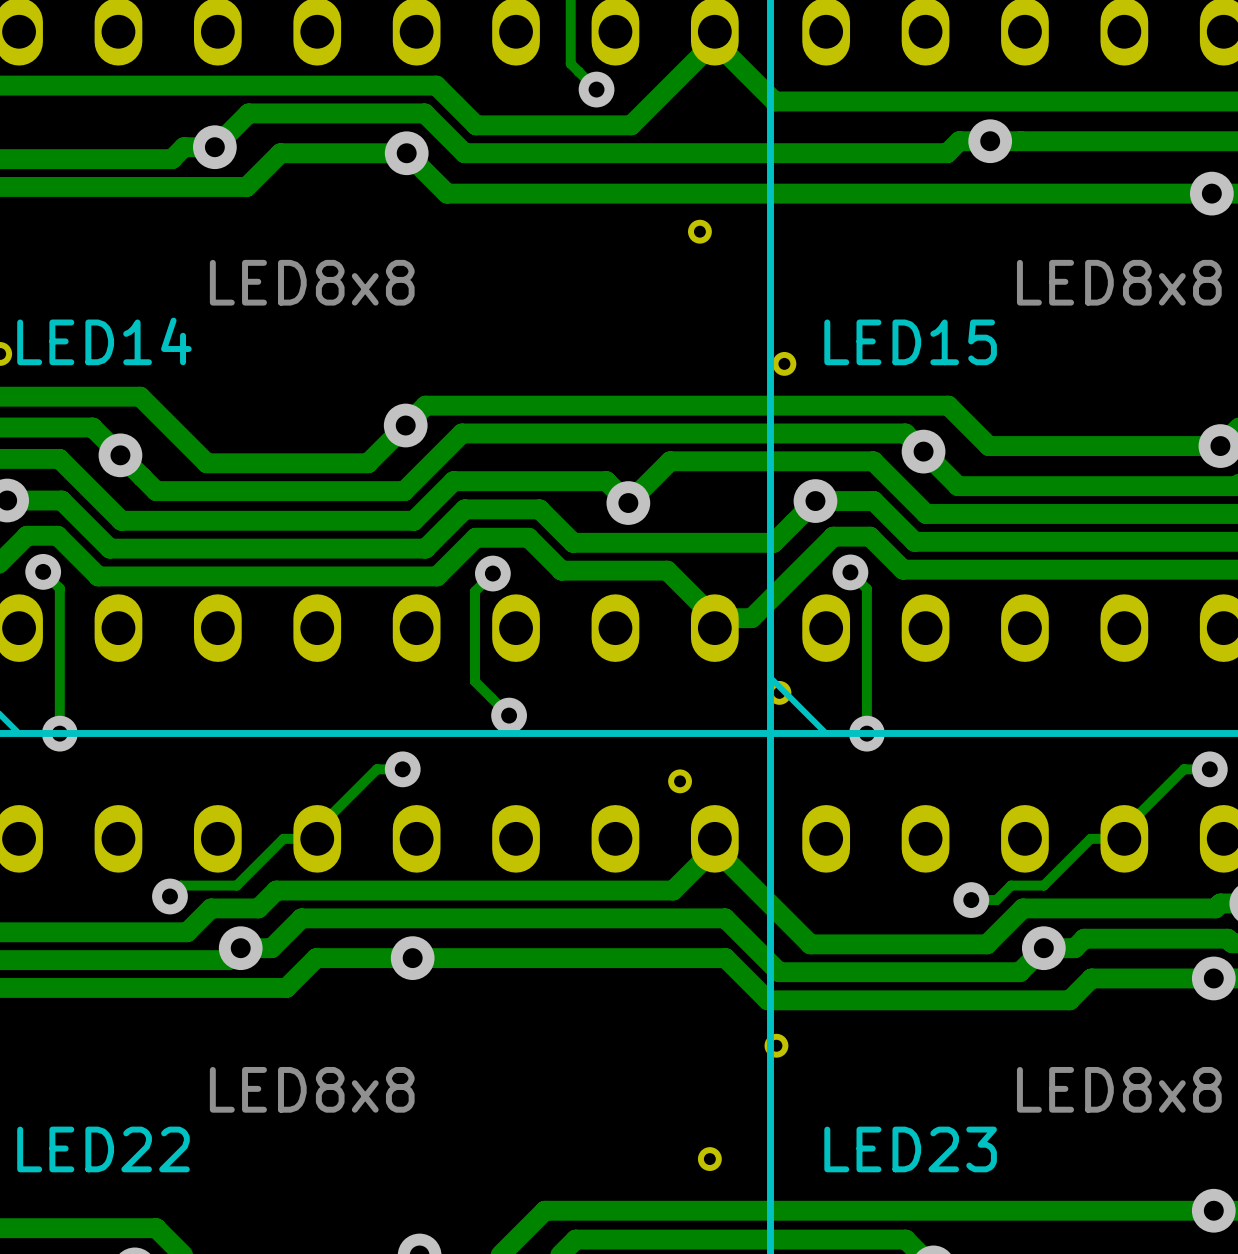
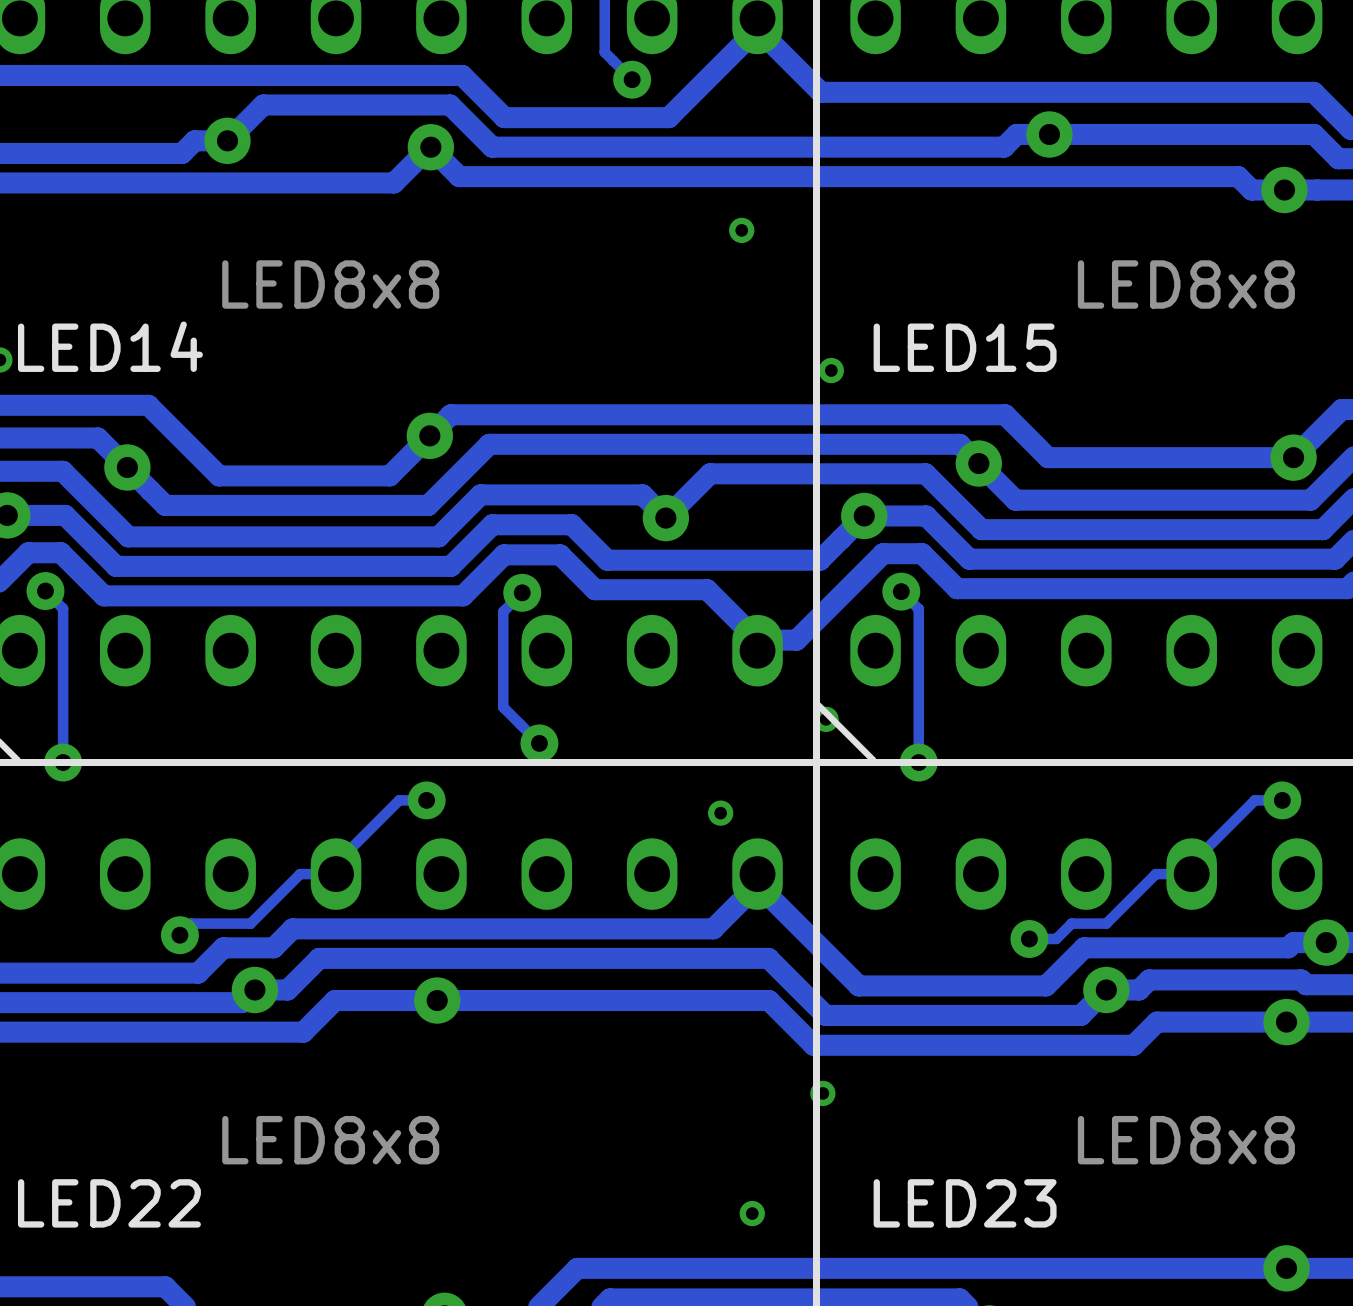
track: (246, 186) (280, 153) (406, 153) (447, 193) (1180, 193) -> (261, 182) (393, 182) (429, 147) (459, 176) (1238, 176) (1251, 190)

